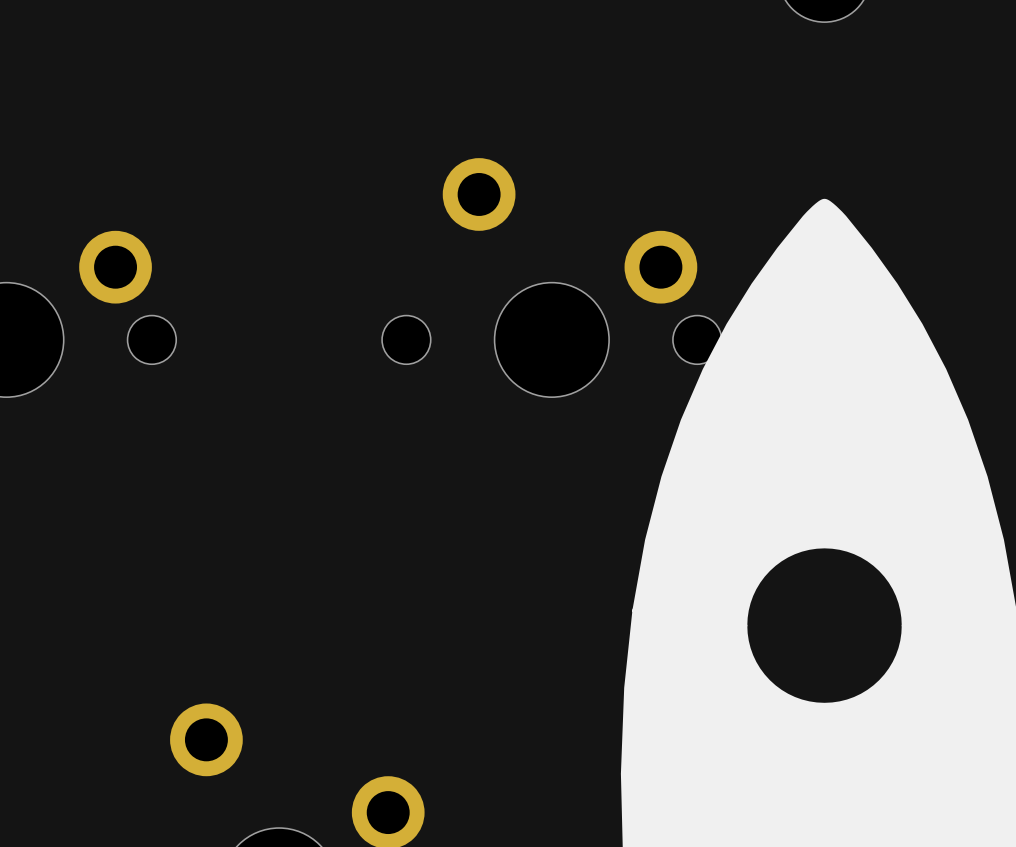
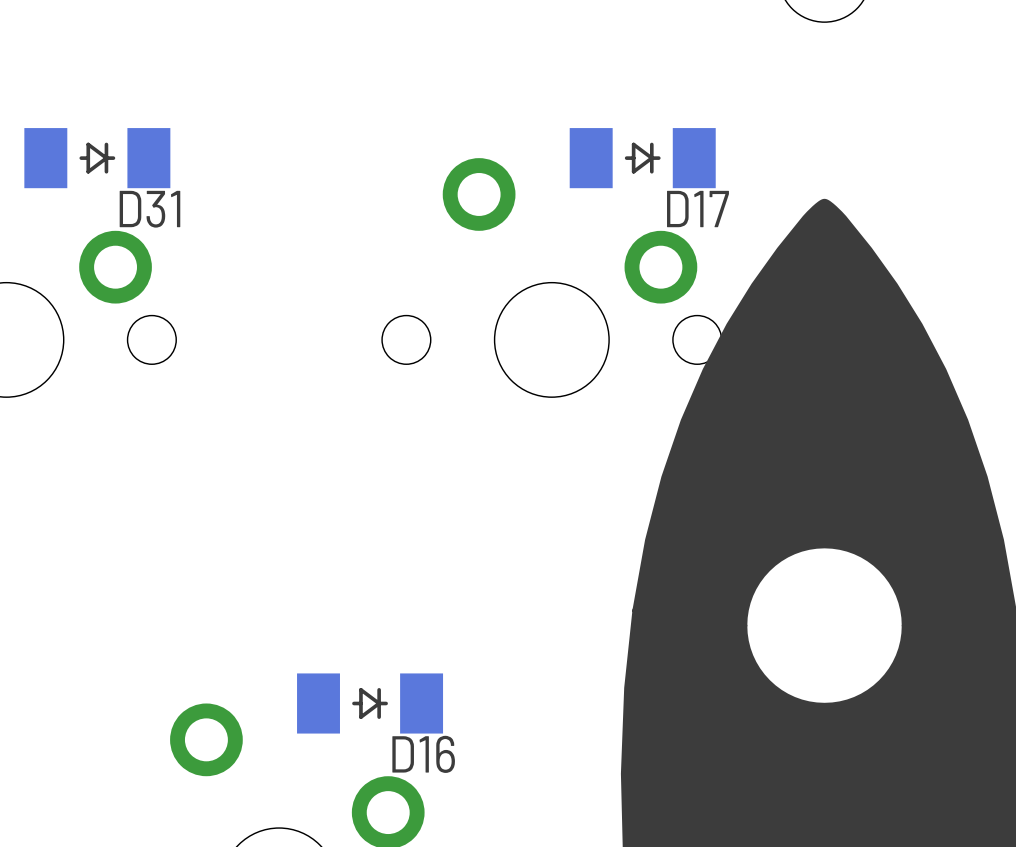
D31: none -> (97, 158)
D17: none -> (642, 158)
D16: none -> (370, 703)

